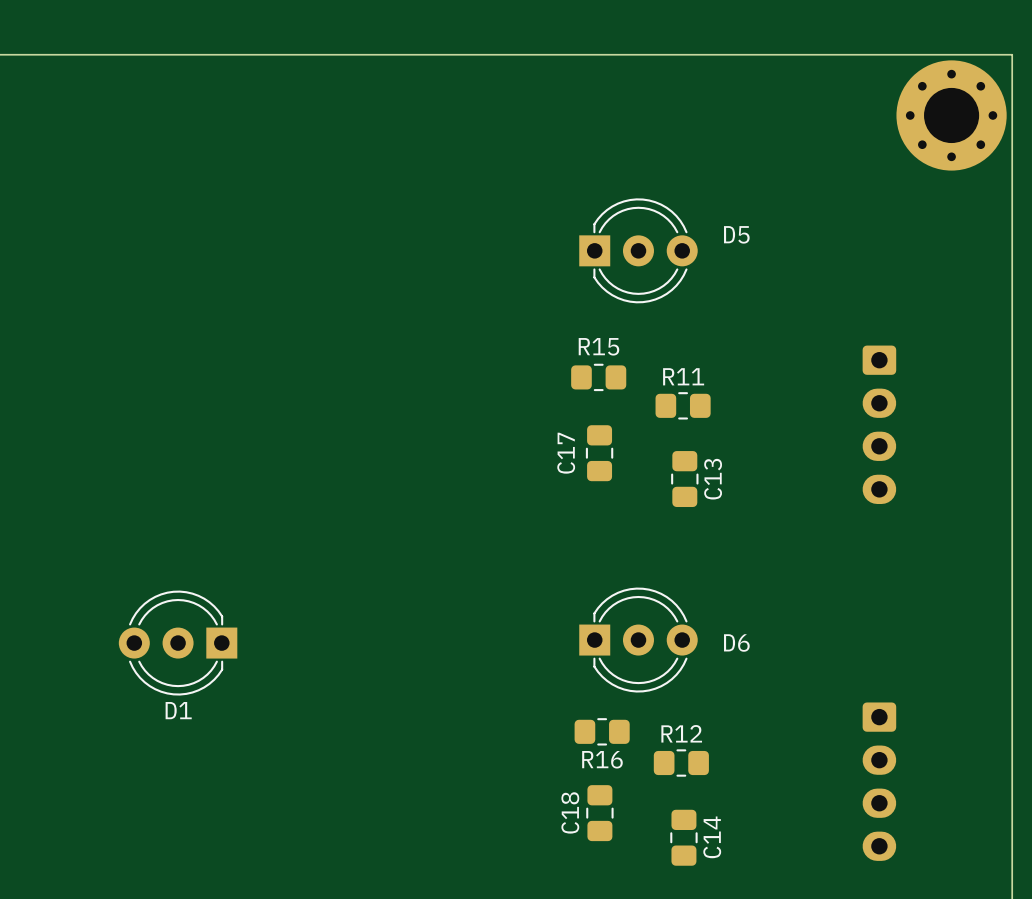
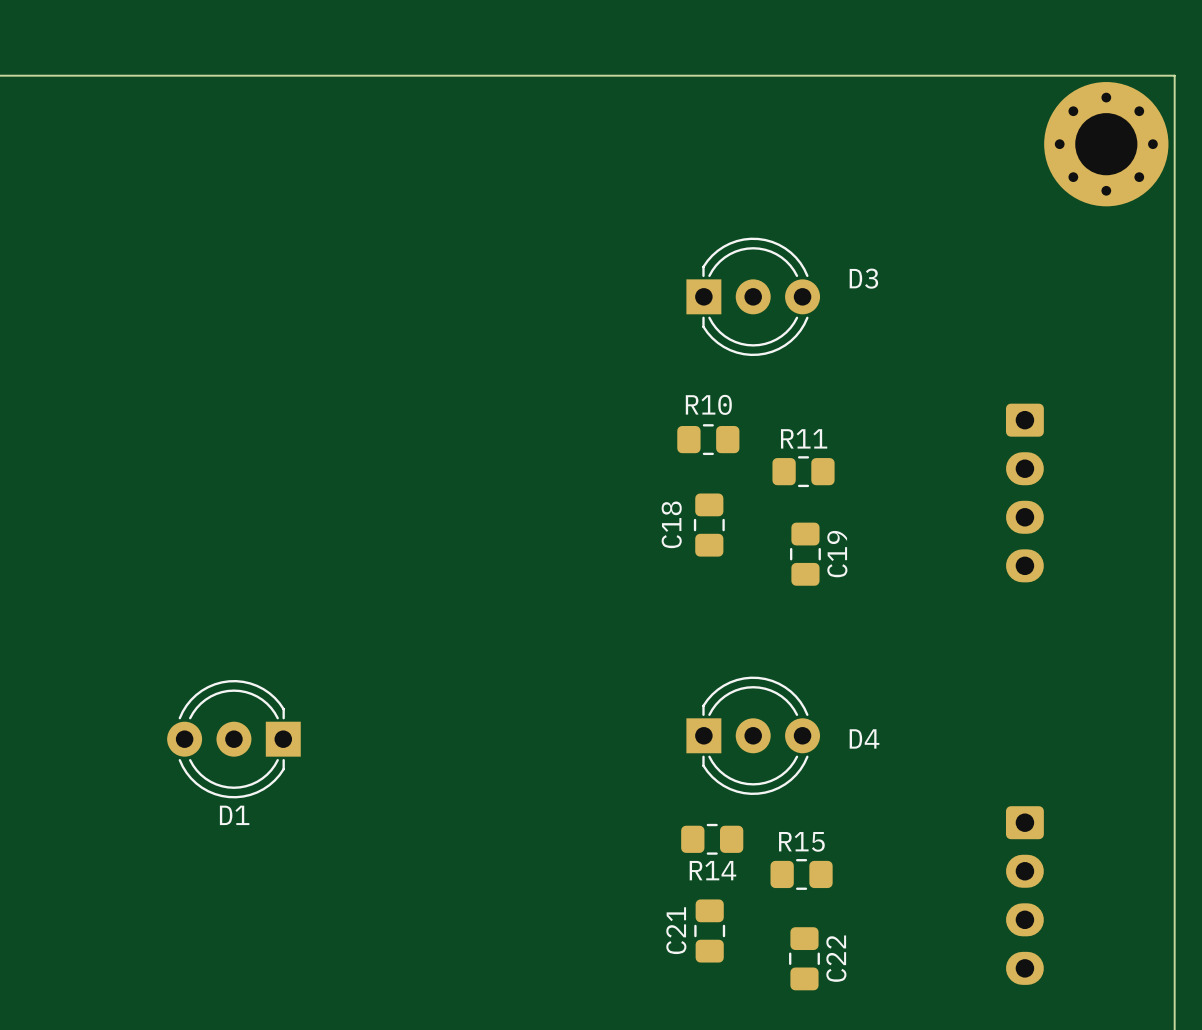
D5 name: D5 (736, 234) -> D3 (863, 278)
R15 name: R15 (598, 346) -> R10 (708, 404)
C17 name: C17 (566, 453) -> C18 (671, 524)
C13 name: C13 (713, 479) -> C19 (837, 554)
D6 name: D6 (736, 642) -> D4 (864, 738)
R12 name: R12 (681, 733) -> R15 (801, 841)
R16 name: R16 (602, 759) -> R14 (712, 870)
C18 name: C18 (570, 812) -> C21 (676, 930)
C14 name: C14 (712, 837) -> C22 (836, 958)

